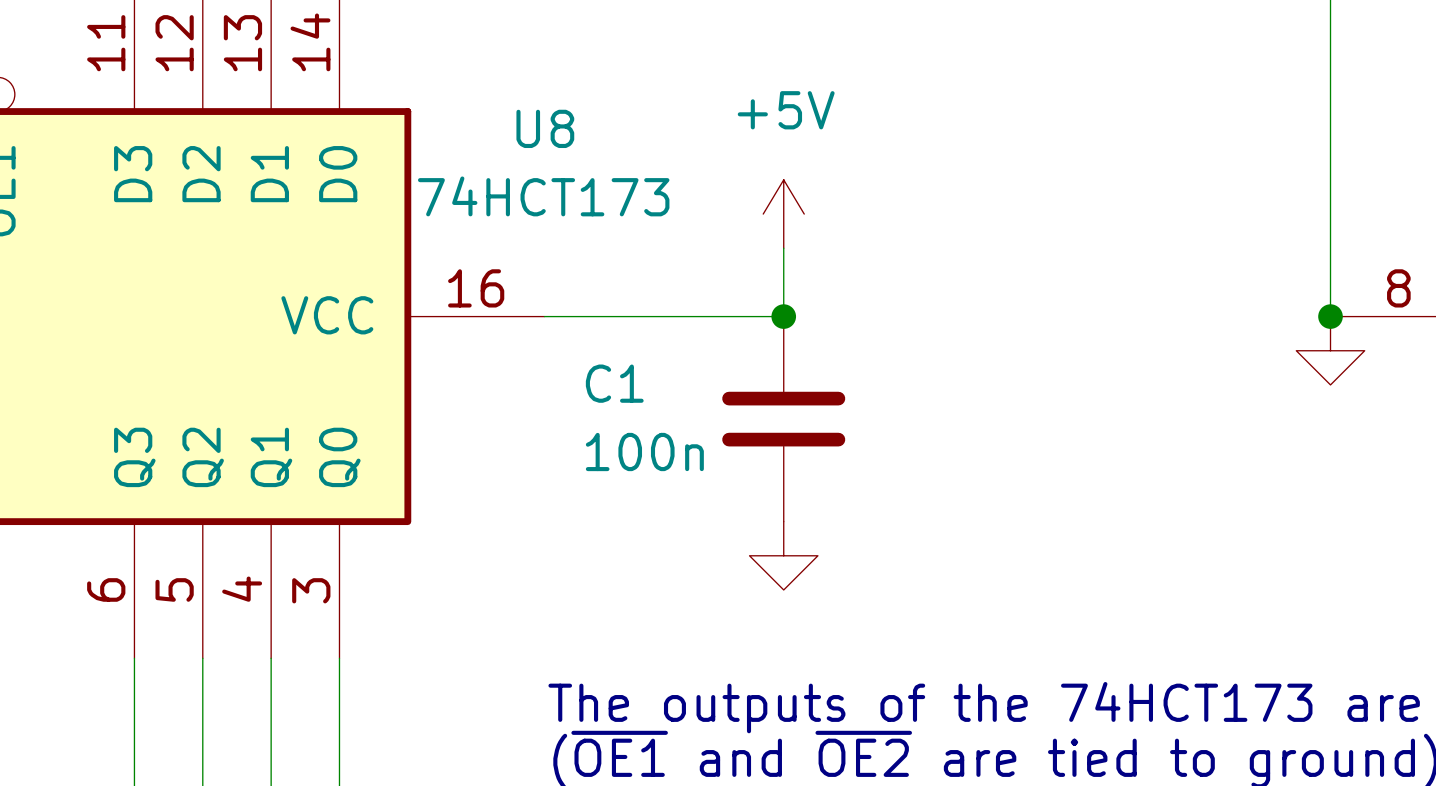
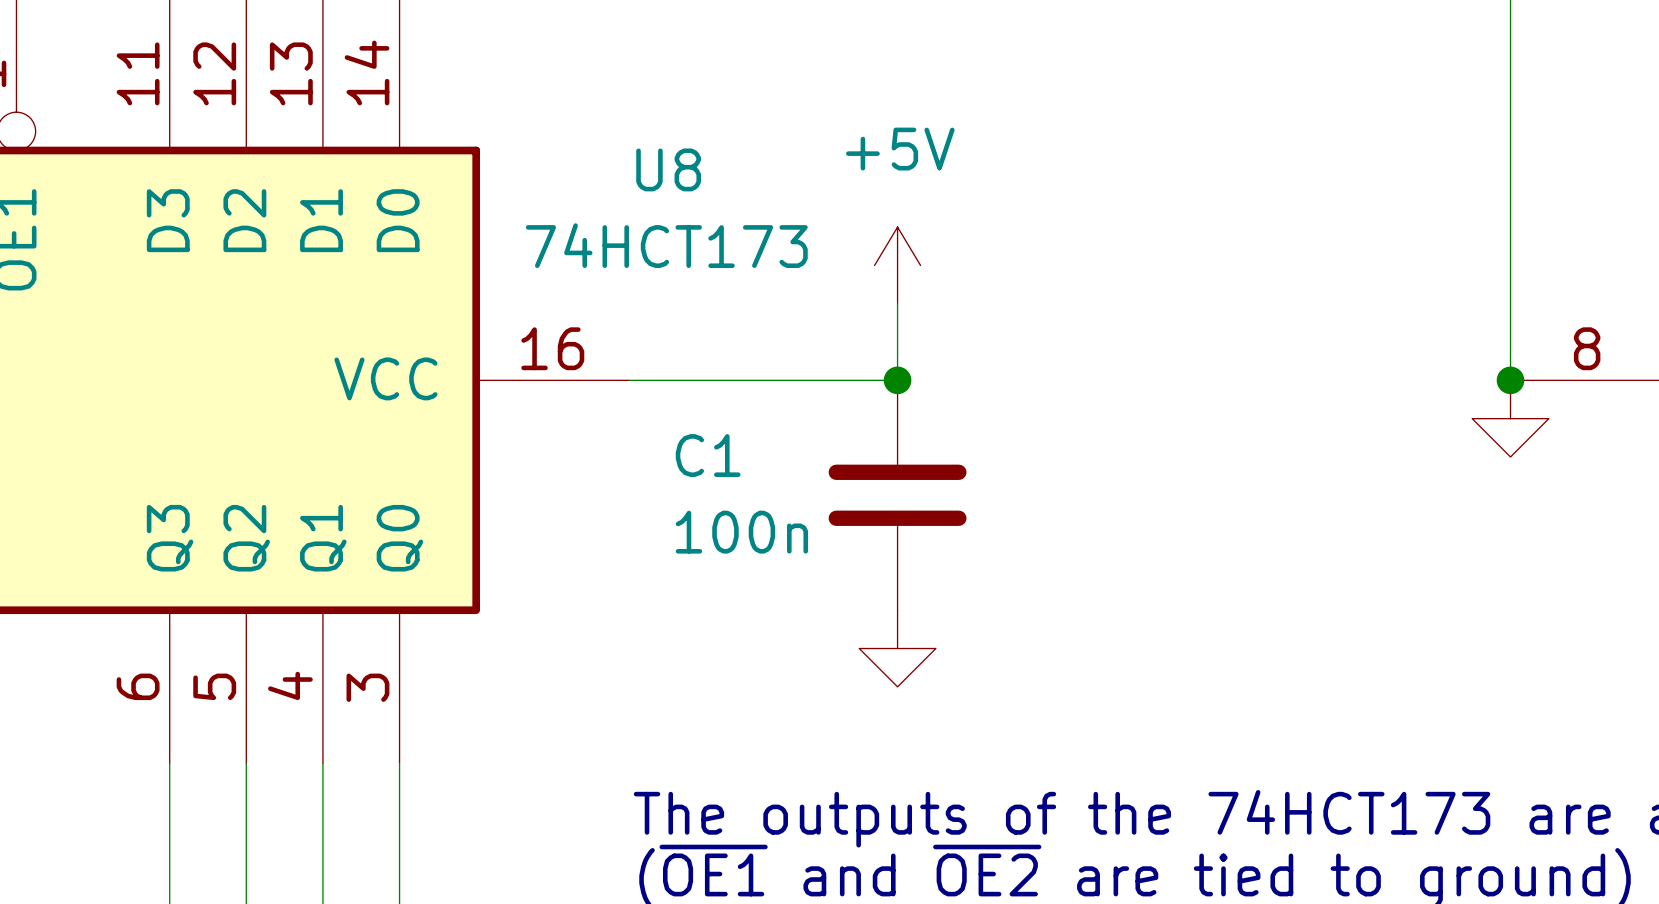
U8 name position: U8 (545, 128) -> U8 (668, 169)
U8 value position: 74HCT173 (543, 196) -> 74HCT173 (666, 245)

